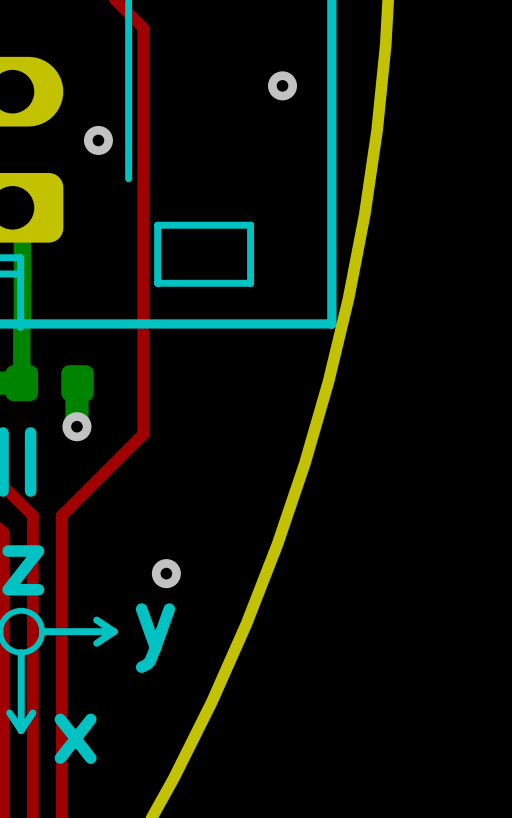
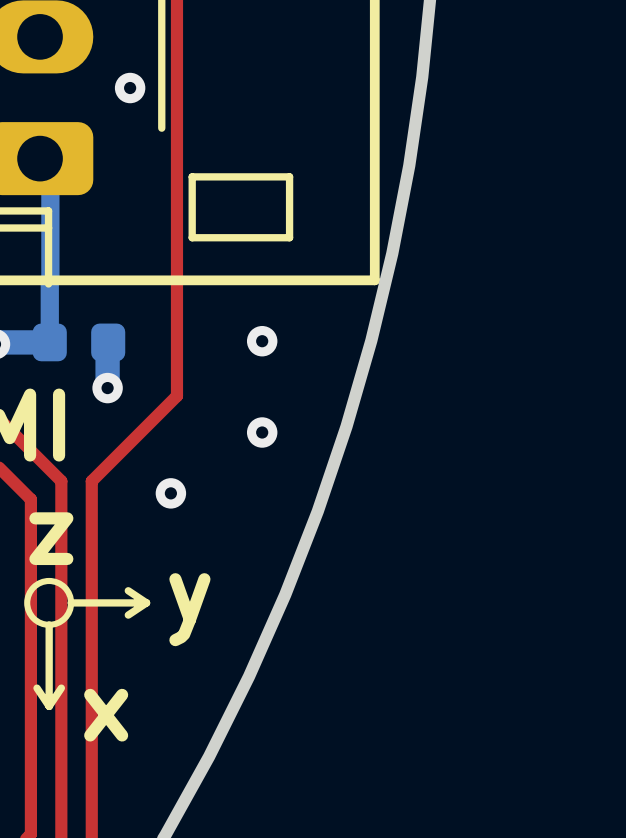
via: (282, 85) -> none
via: none -> (262, 341)
via: none -> (262, 432)
via position: (166, 573) -> (170, 493)

